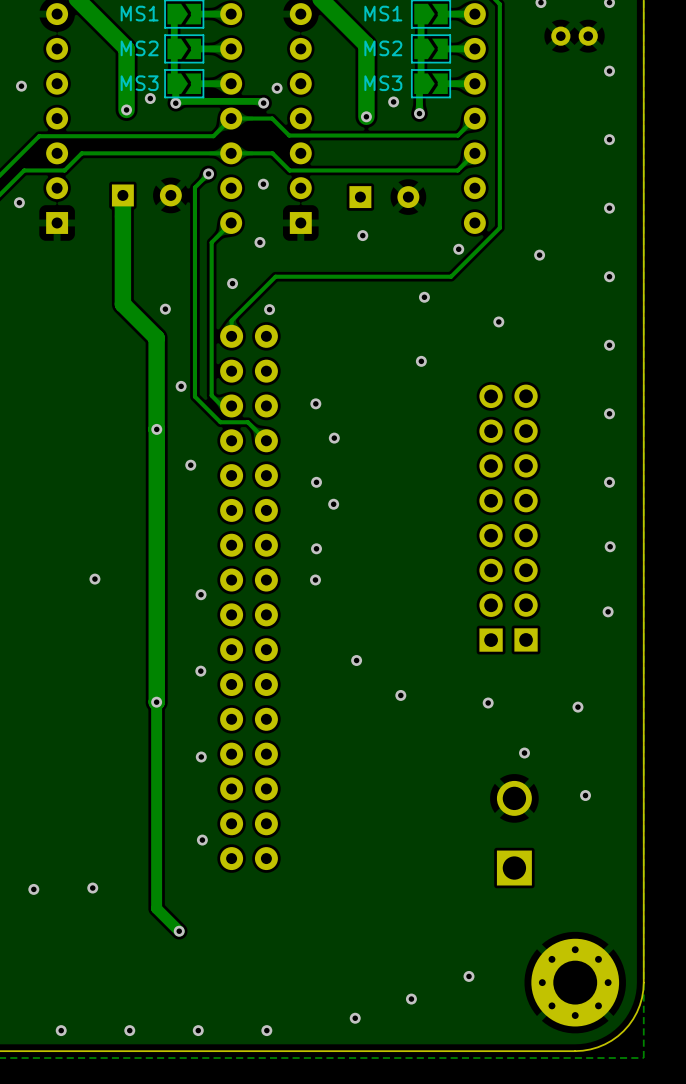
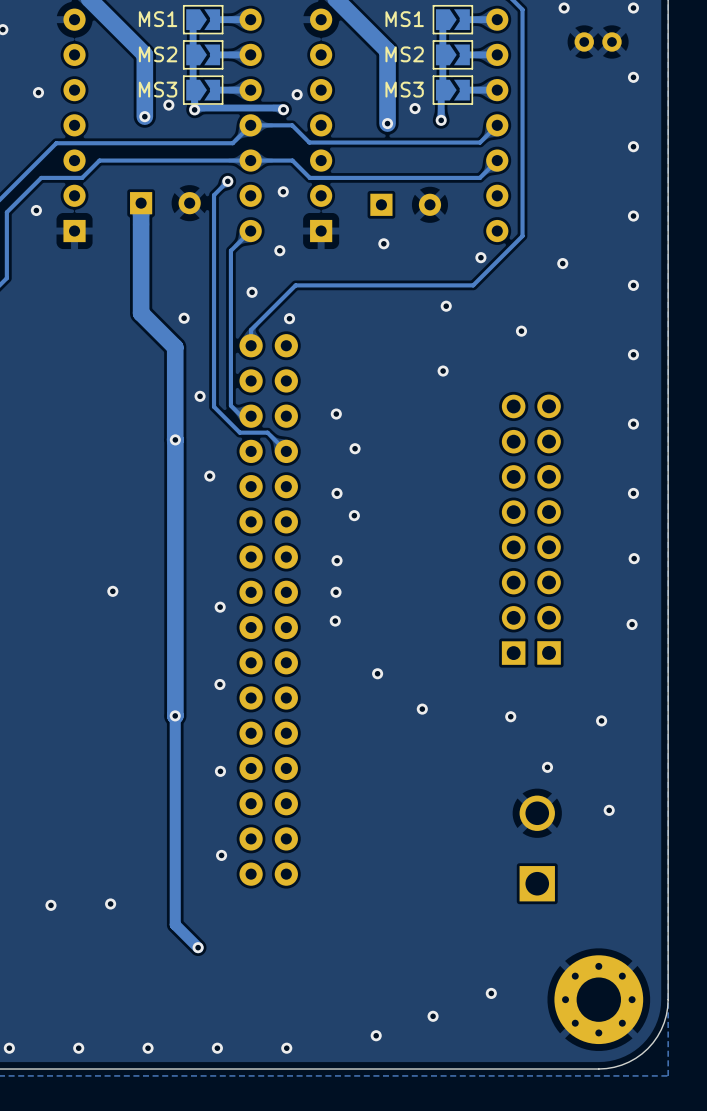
via: none -> (335, 621)

